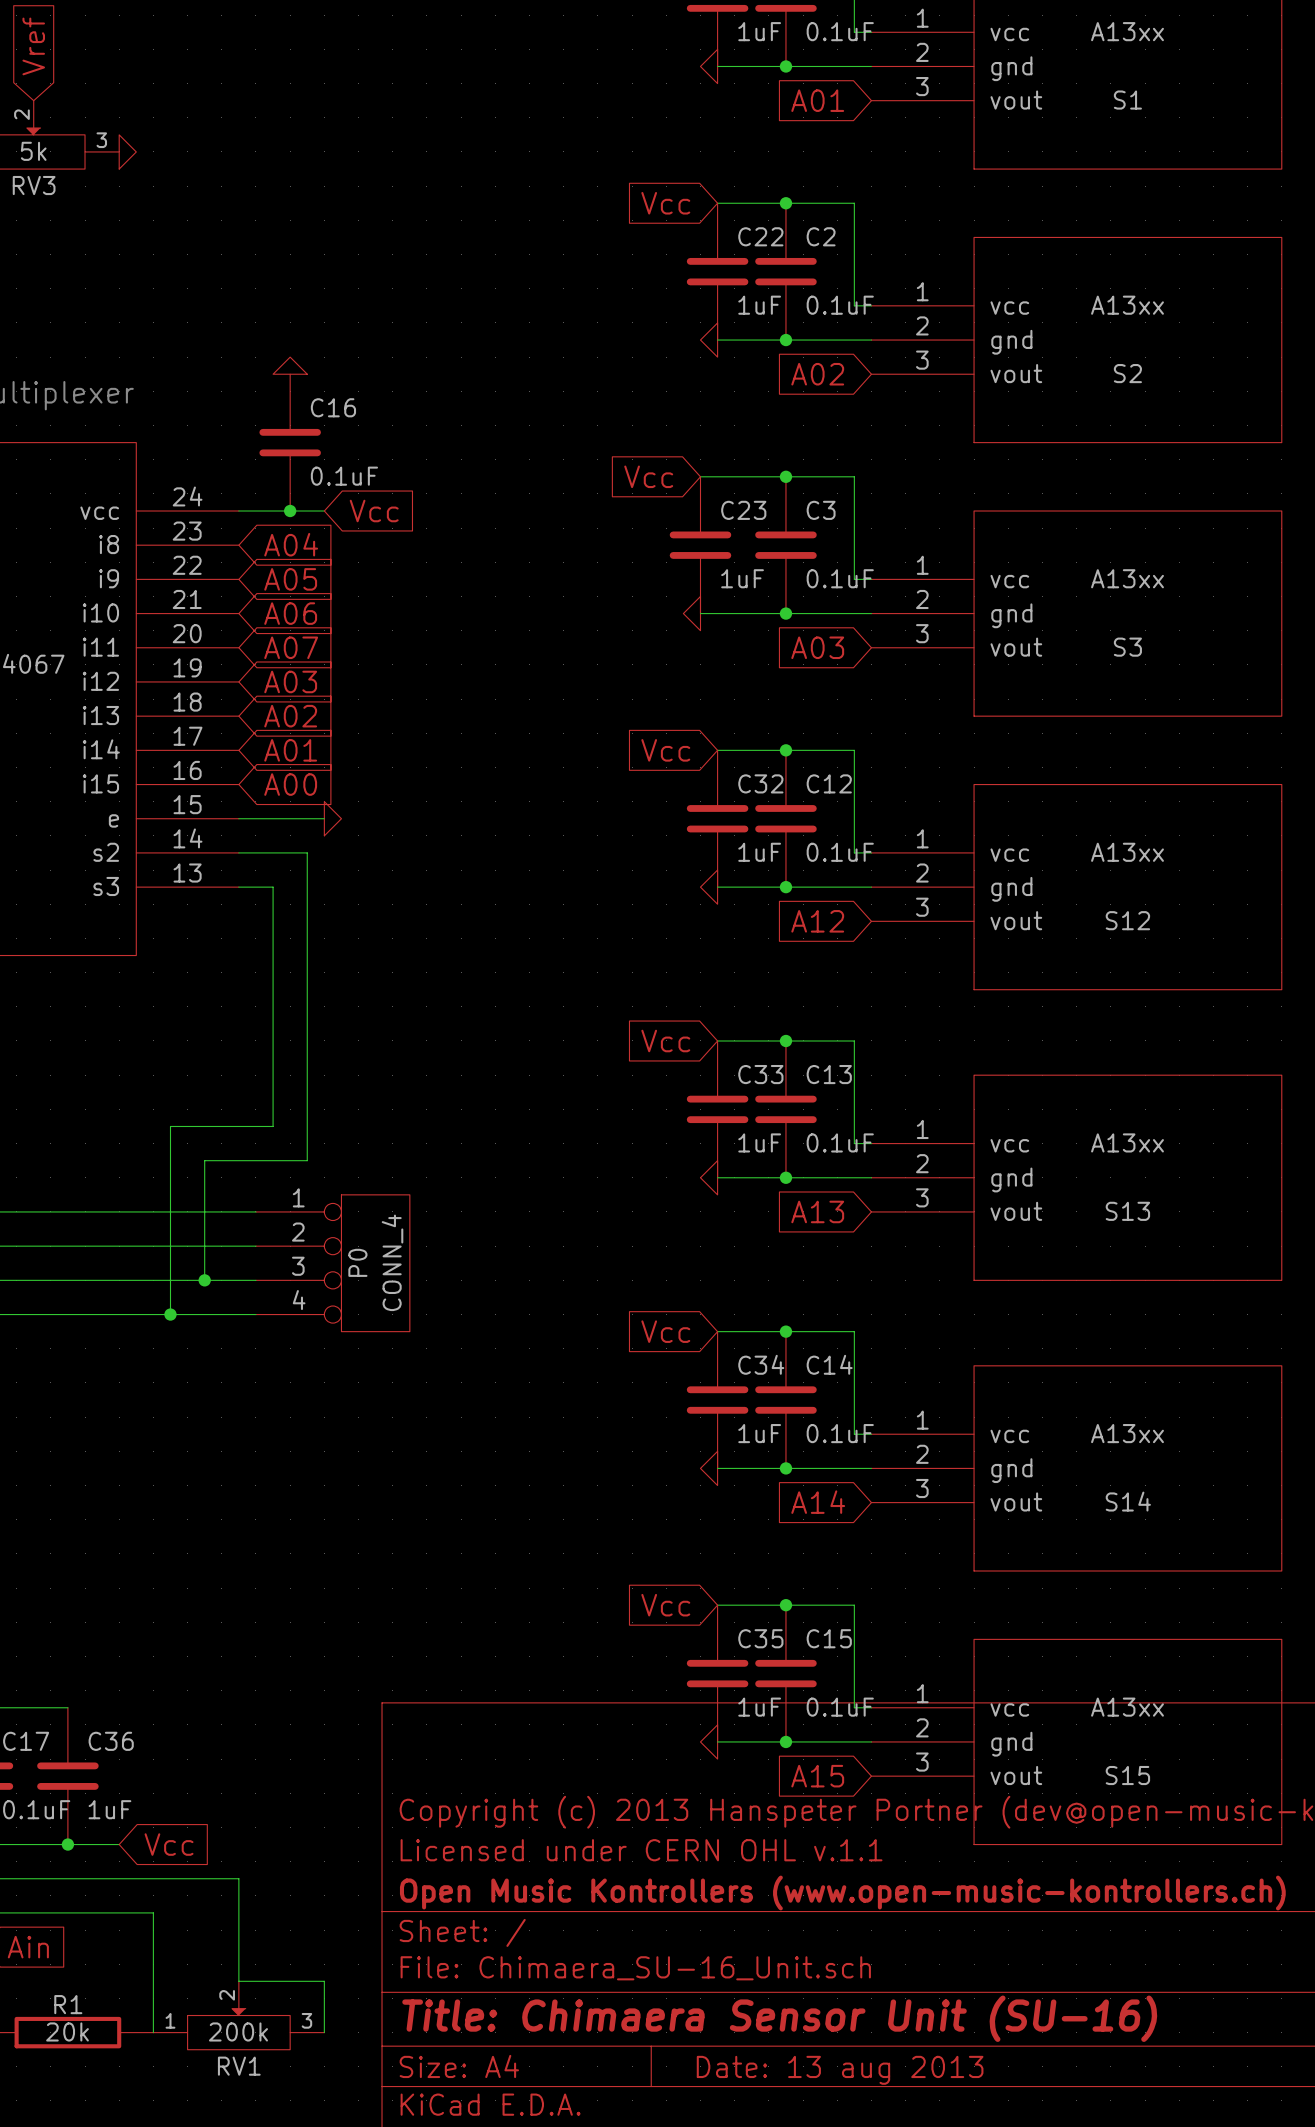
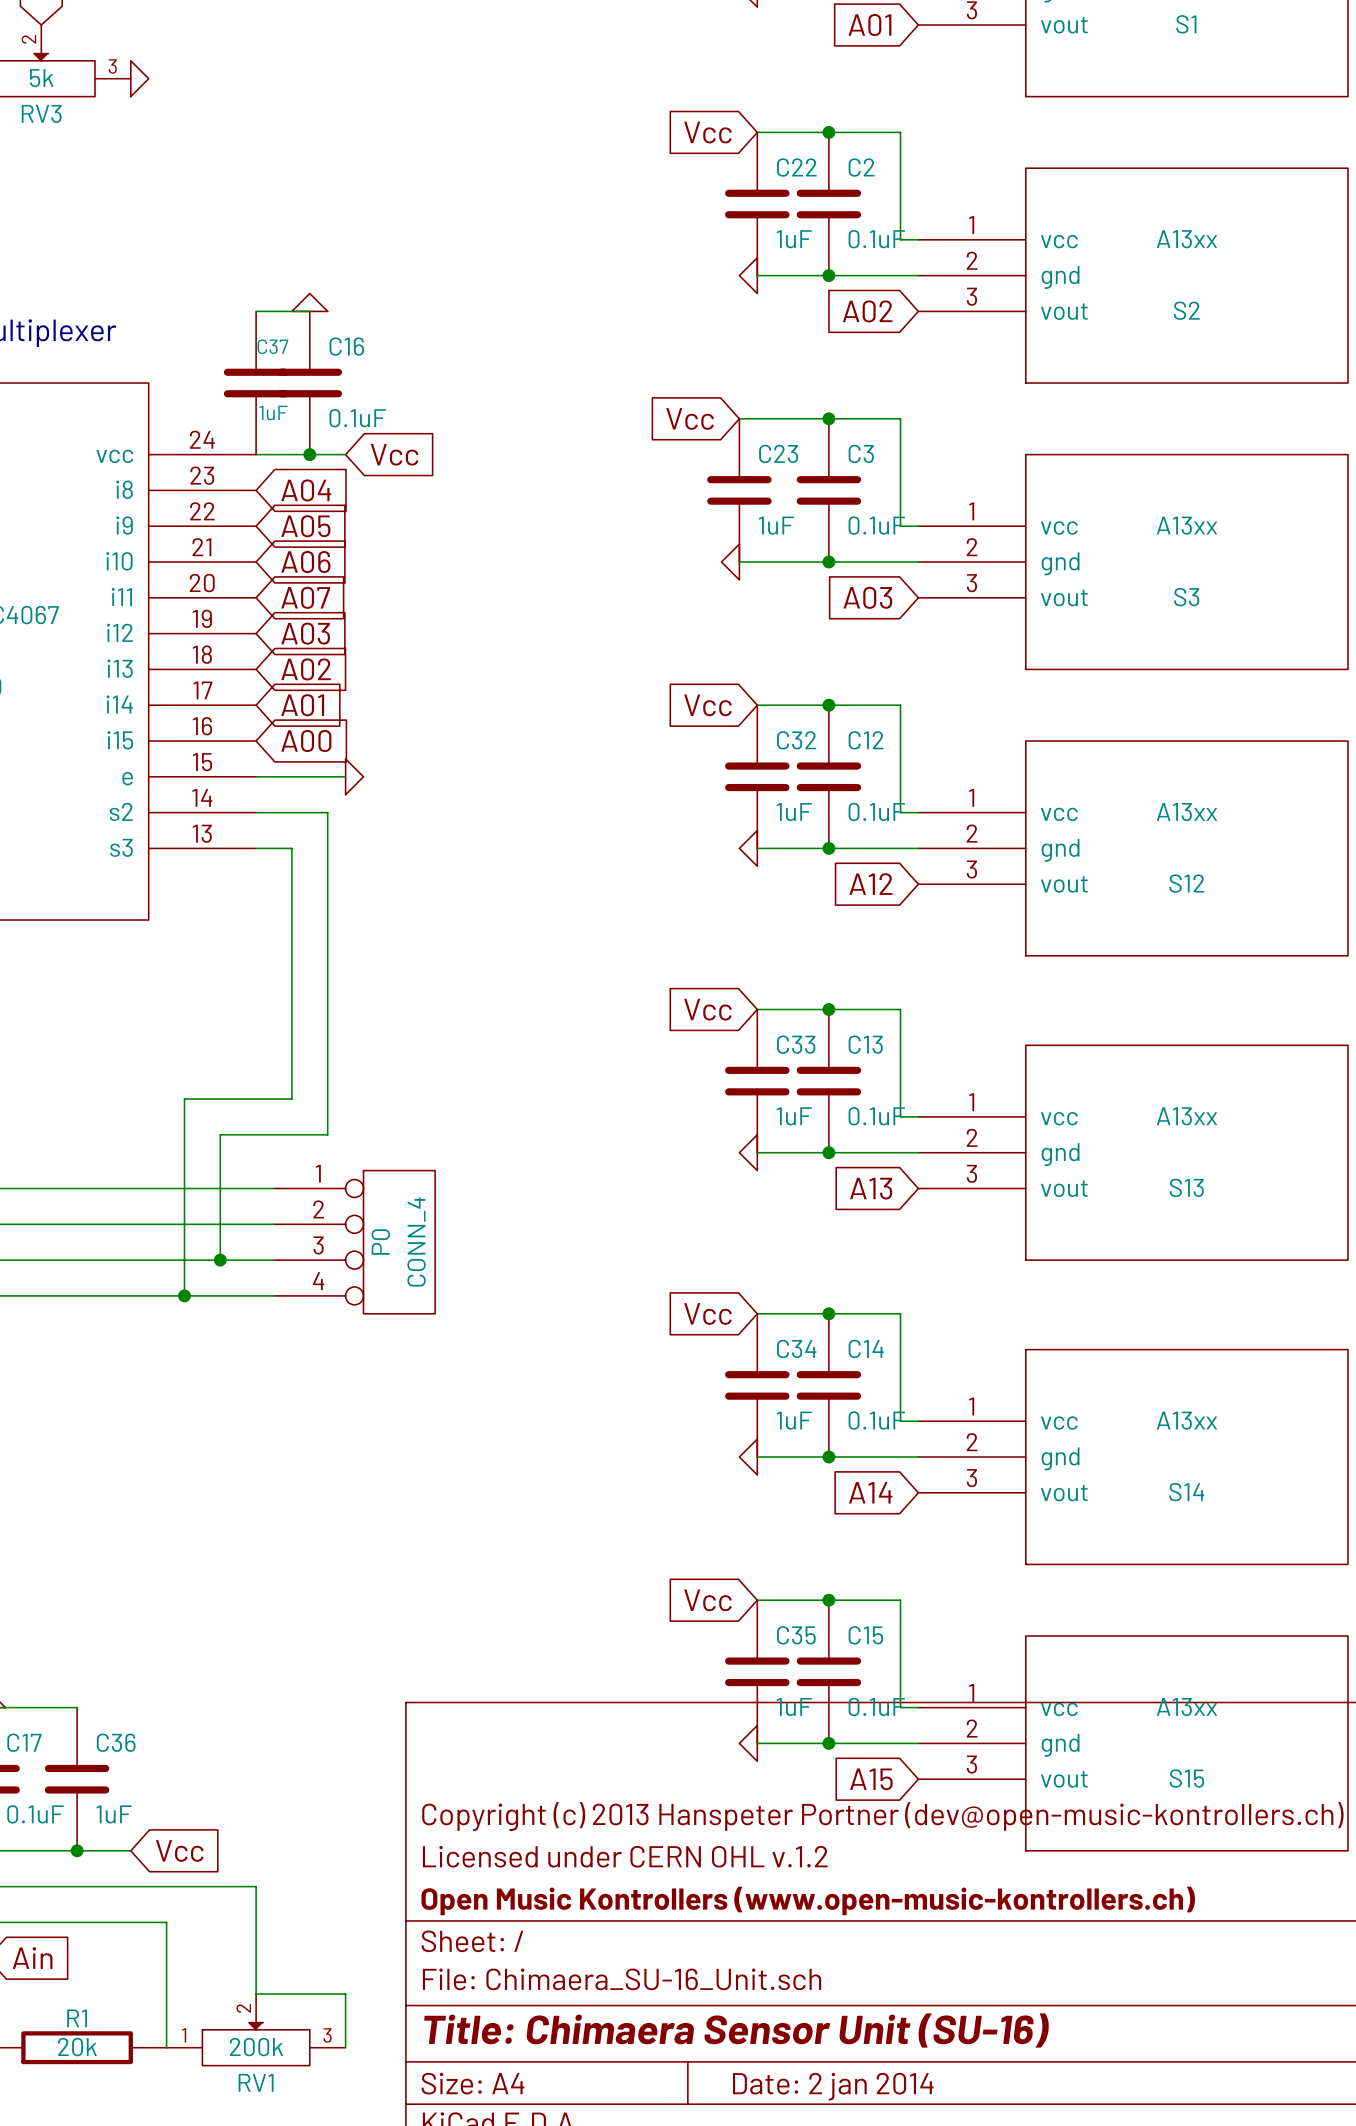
wire: none -> (256, 311) (309, 311)
C37: none -> 1uF (256, 383)
title block: Licensed under CERN OHL v.1.1 (641, 1850) -> Licensed under CERN OHL v.1.2 (625, 1856)
title block: Date: 13 aug 2013 (840, 2070) -> Date: 2 jan 2014 (833, 2086)

